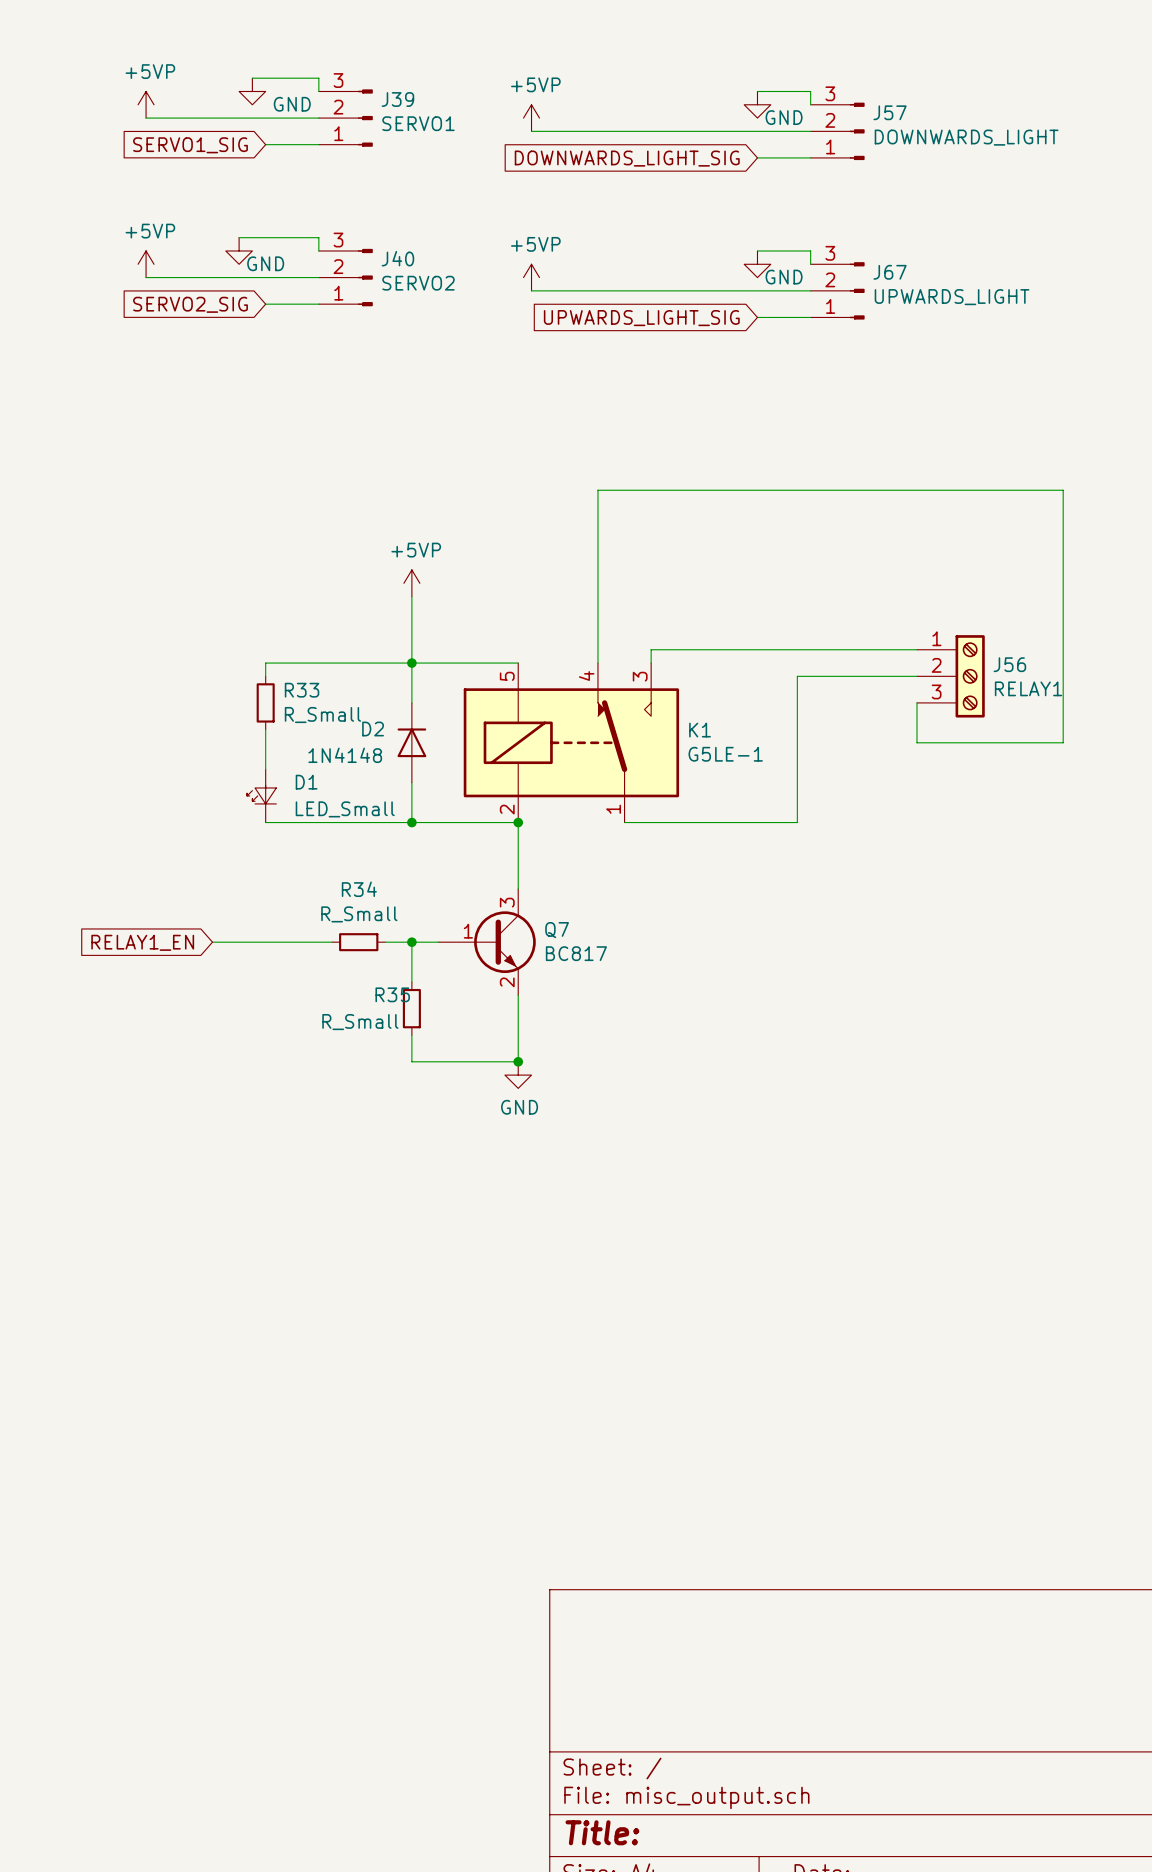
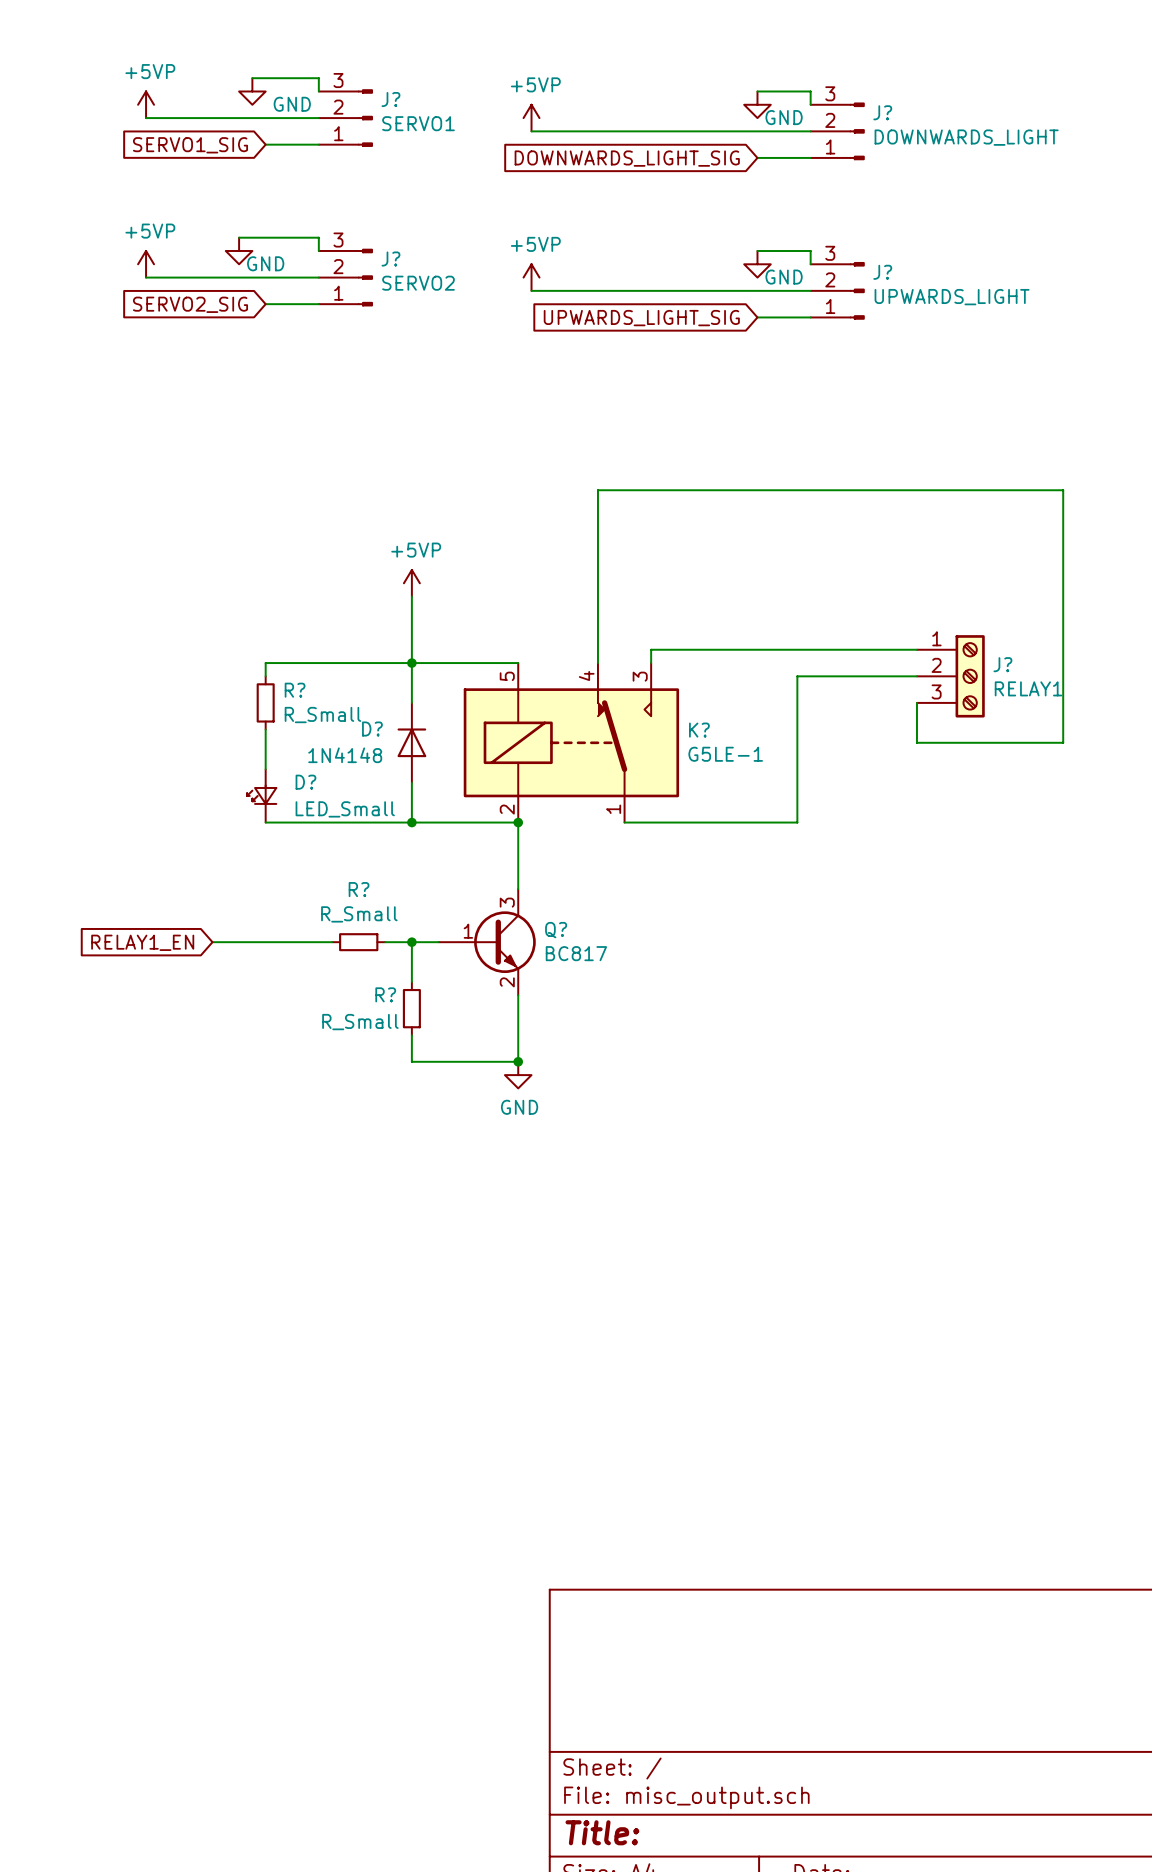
J39 name: J39 (397, 99) -> J? (390, 99)
J57 name: J57 (890, 112) -> J? (882, 112)
J40 name: J40 (397, 258) -> J? (390, 259)
J67 name: J67 (890, 272) -> J? (882, 272)
J56 name: J56 (1009, 664) -> J? (1002, 664)
R33 name: R33 (302, 690) -> R? (295, 690)
D2 name: D2 (373, 729) -> D? (372, 729)
K1 name: K1 (700, 730) -> K? (699, 730)
D1 name: D1 (306, 782) -> D? (305, 782)
R34 name: R34 (359, 889) -> R? (359, 889)
Q7 name: Q7 (557, 930) -> Q? (556, 930)
R35 name: R35 (392, 994) -> R? (385, 994)

